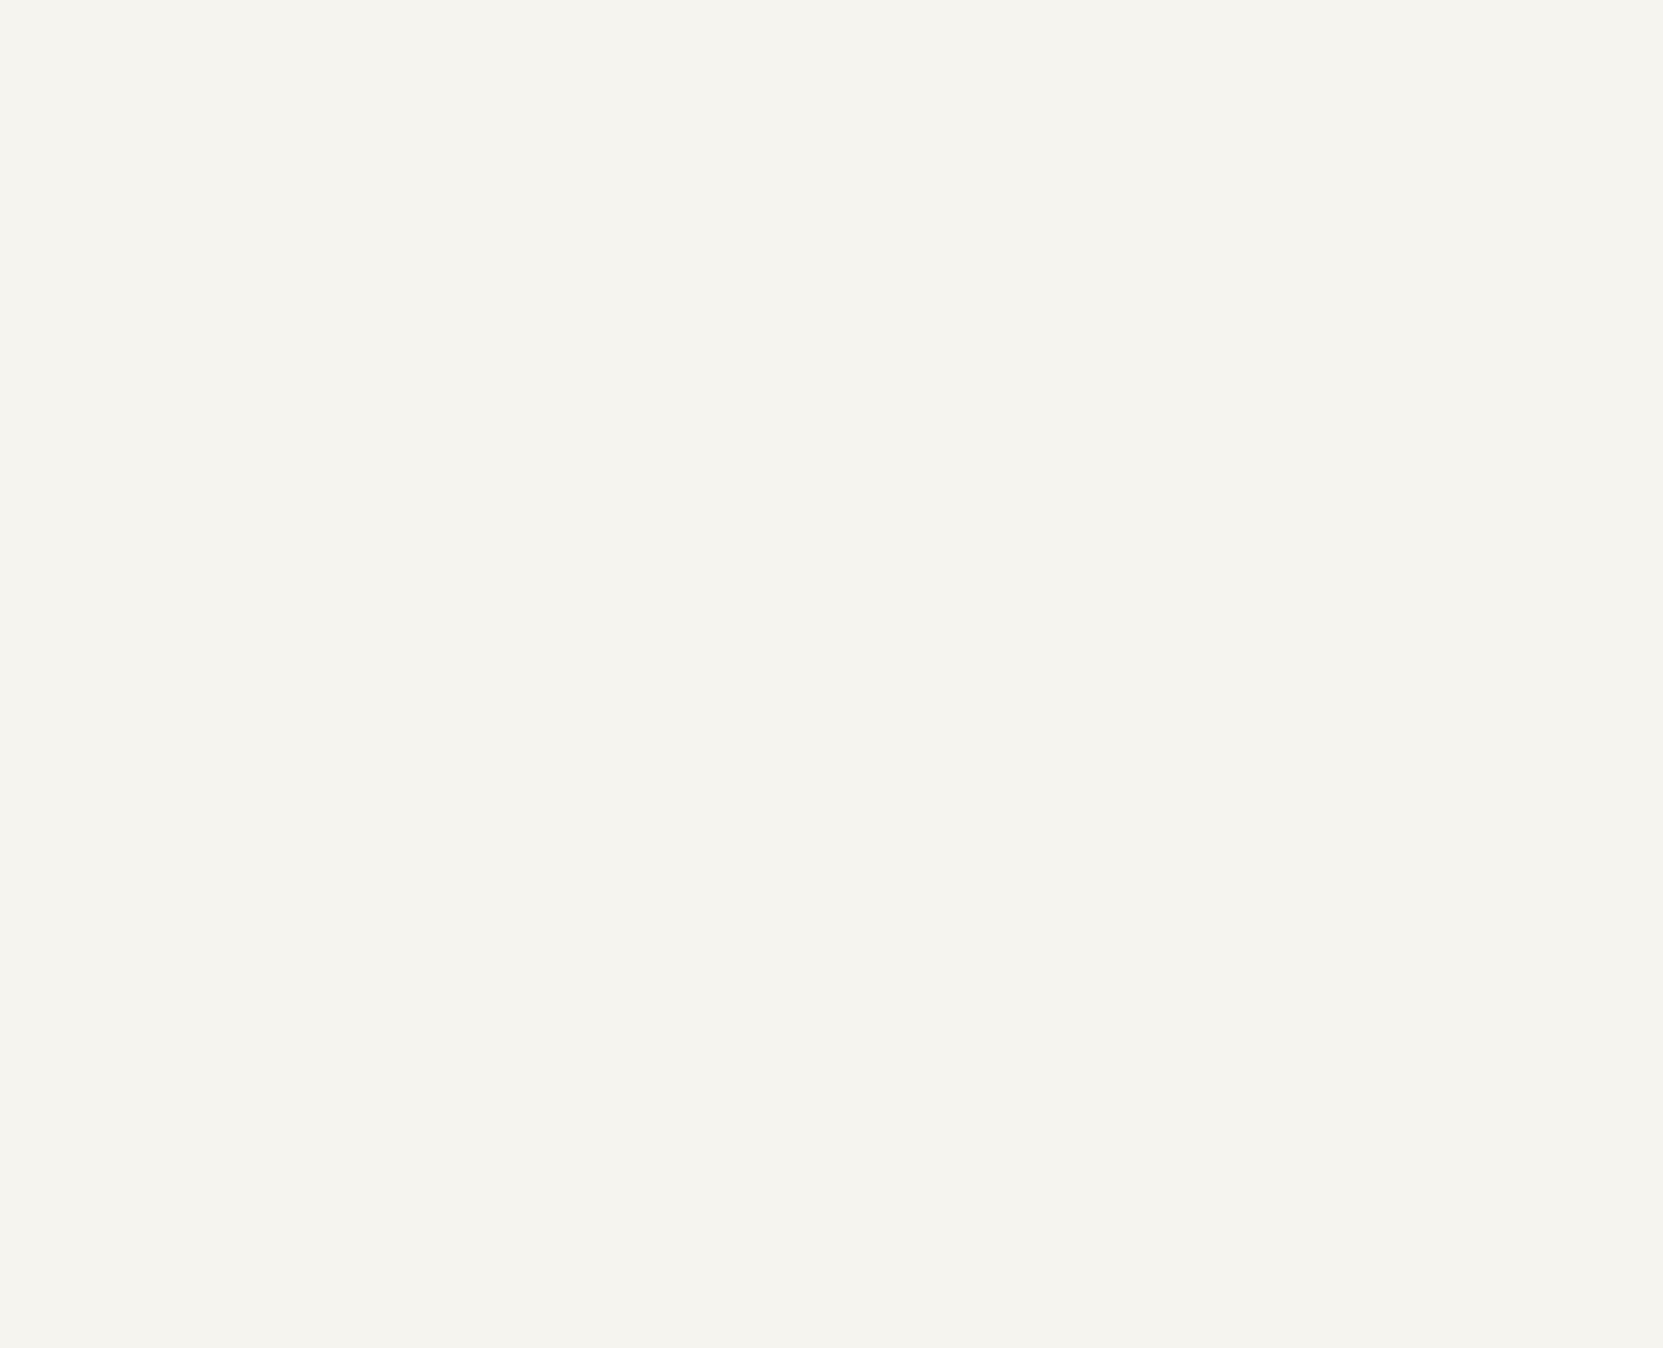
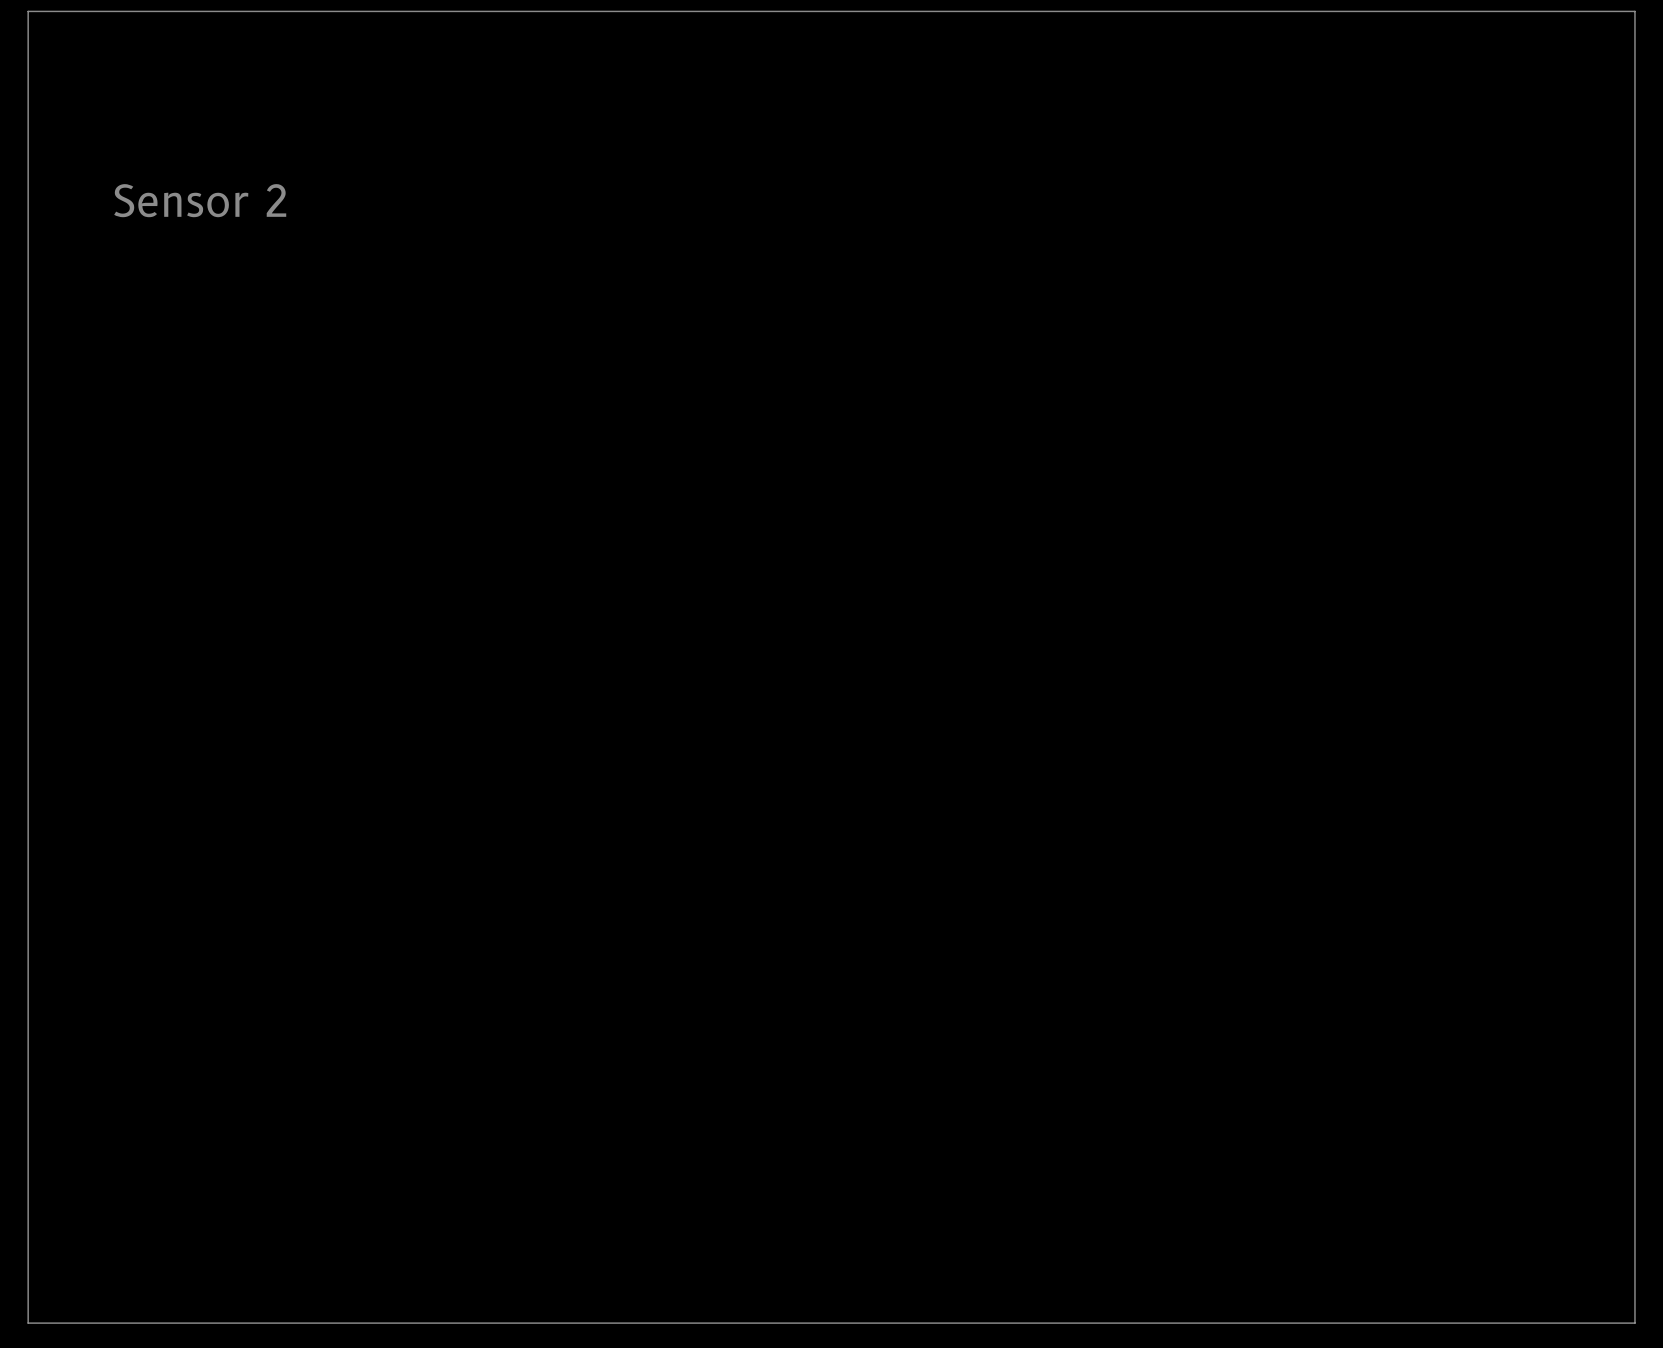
line: none -> (28, 11) (1634, 11) (1634, 1323) (28, 1323) (28, 11)
text: none -> Sensor 2 (200, 200)

